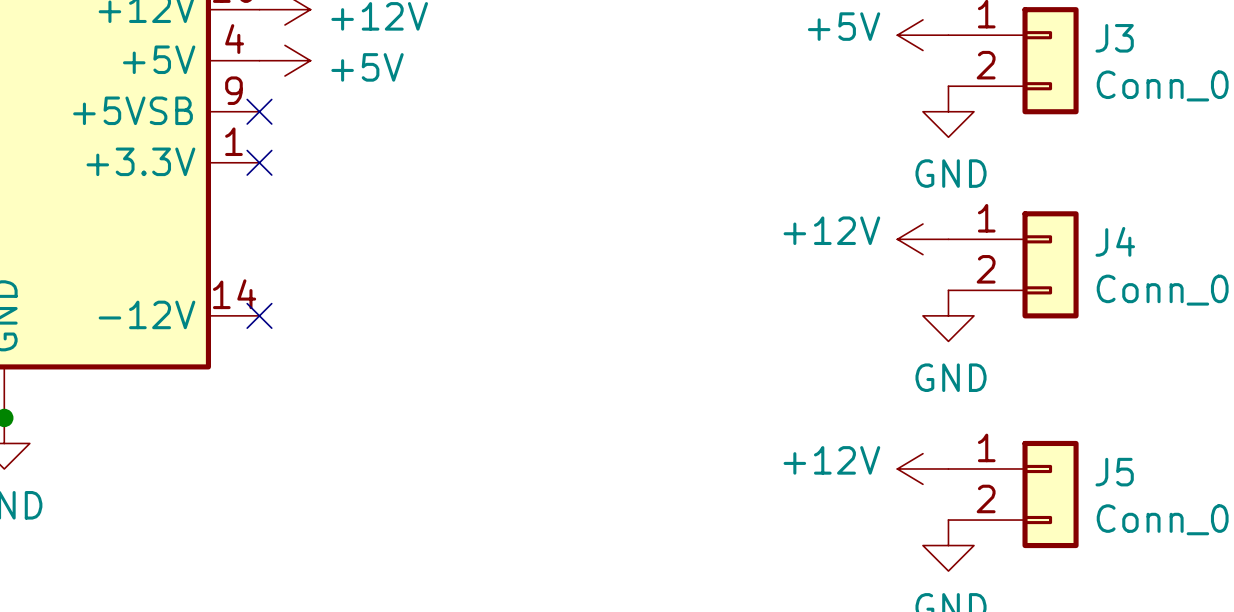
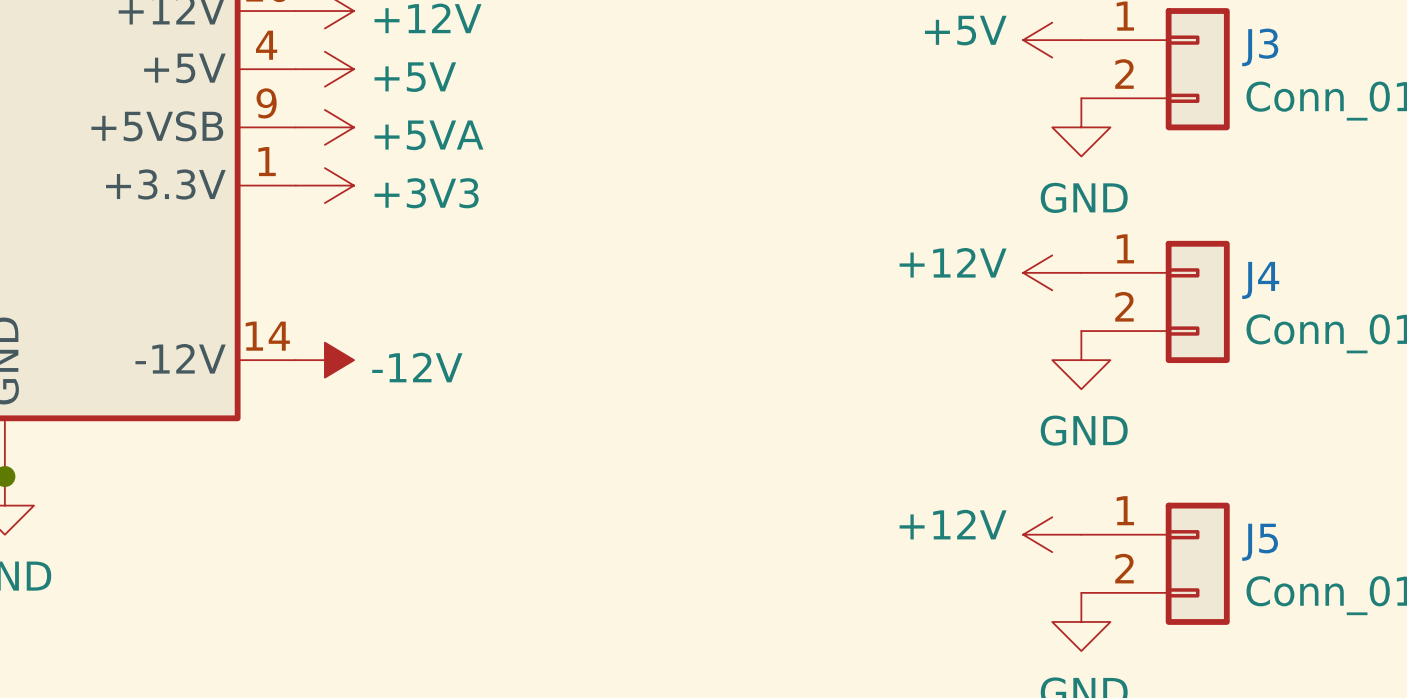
no-connect mark: (259, 111) -> none
power symbol: none -> +5VA (324, 127)
no-connect mark: (259, 162) -> none
power symbol: none -> +3V3 (324, 185)
no-connect mark: (259, 315) -> none
power symbol: none -> -12V (324, 360)

